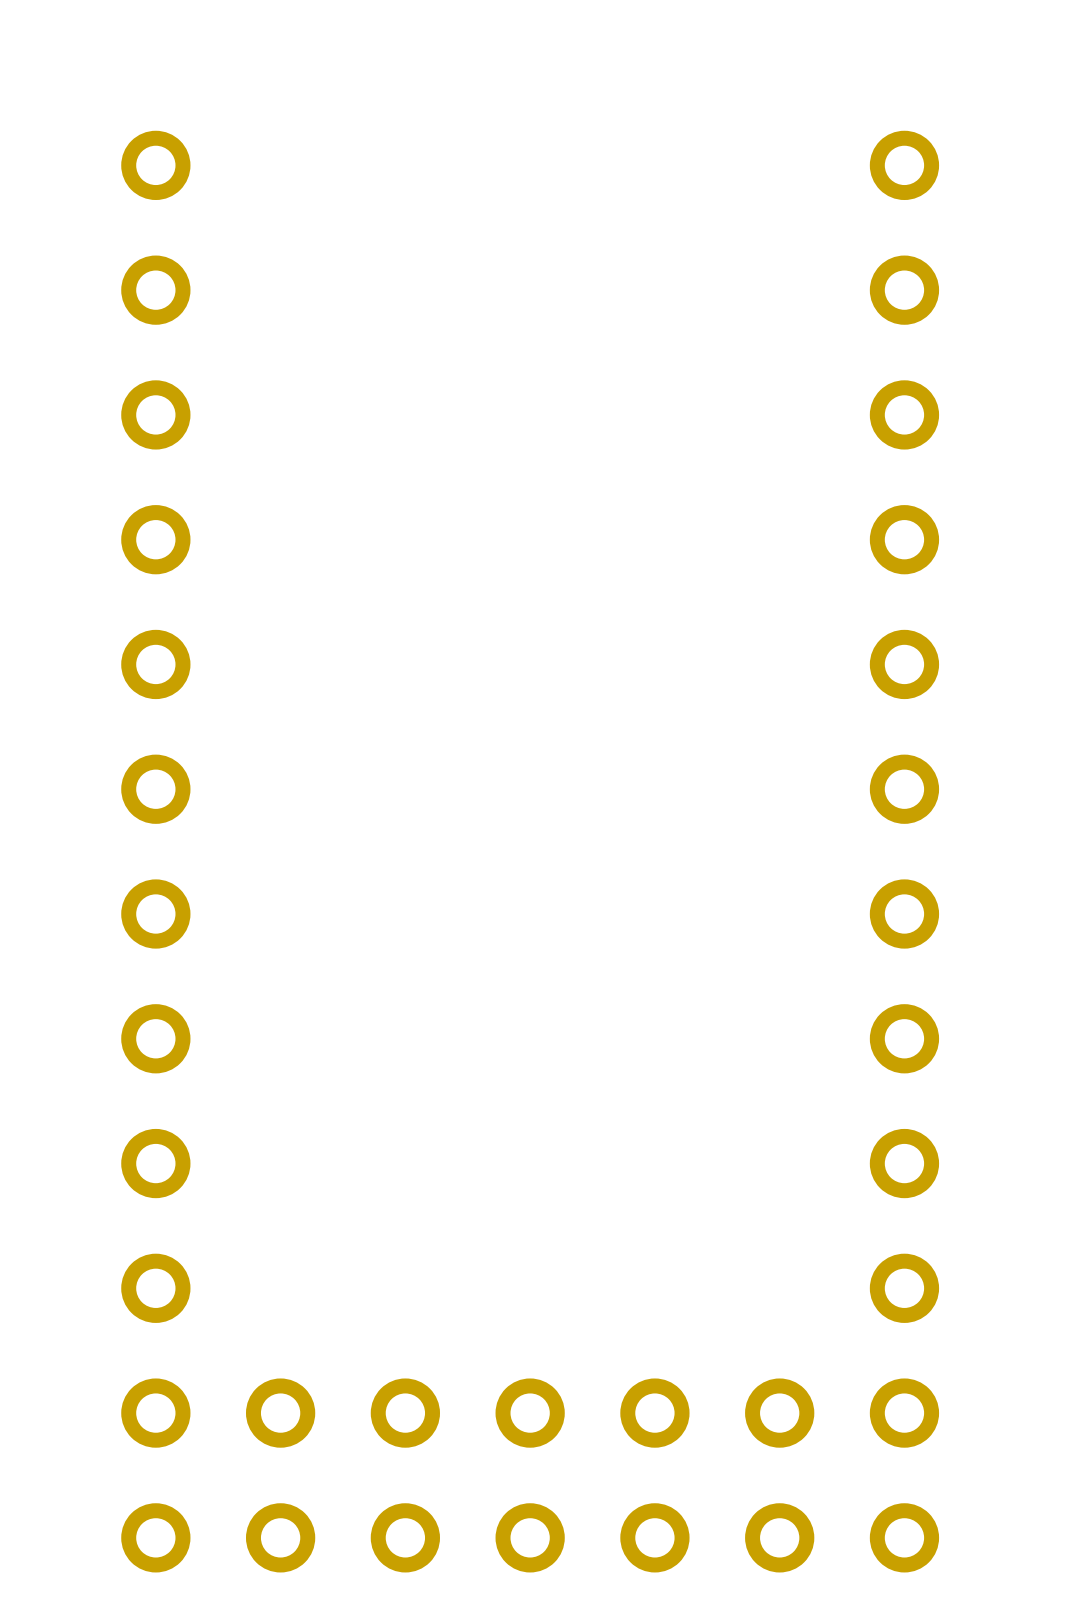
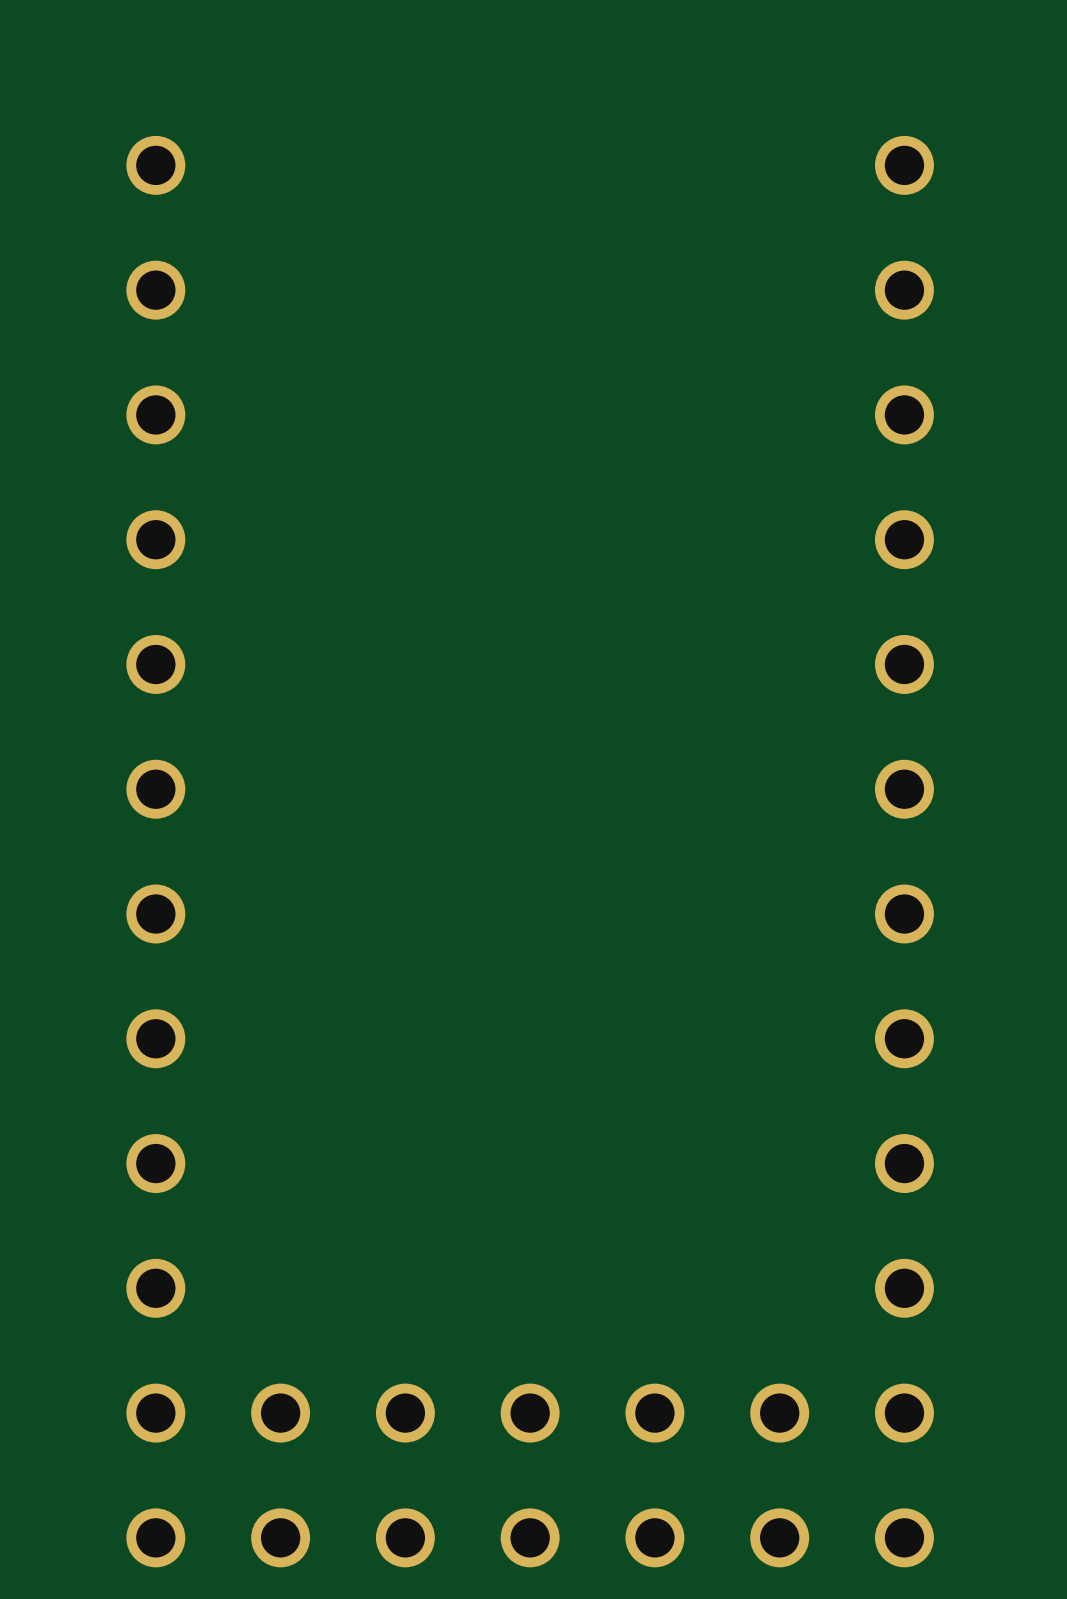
part footprint: [121, 130, 940, 1573] -> [126, 135, 934, 1568]

